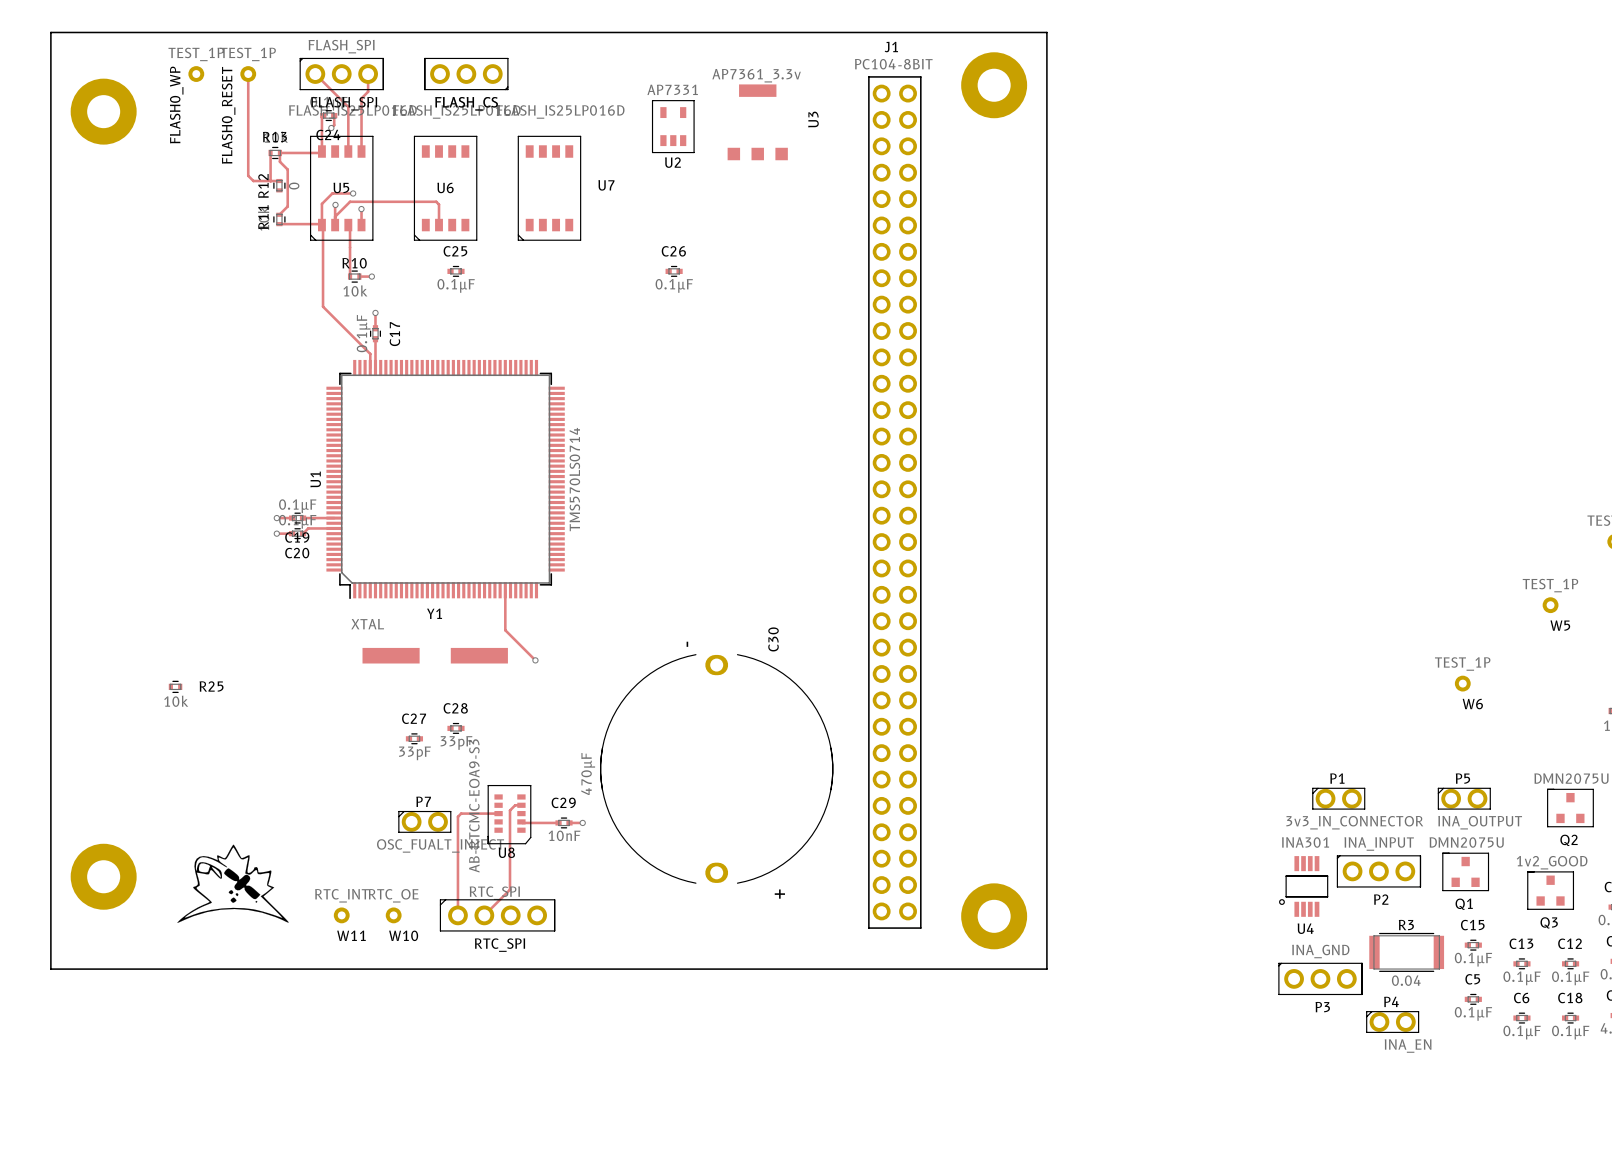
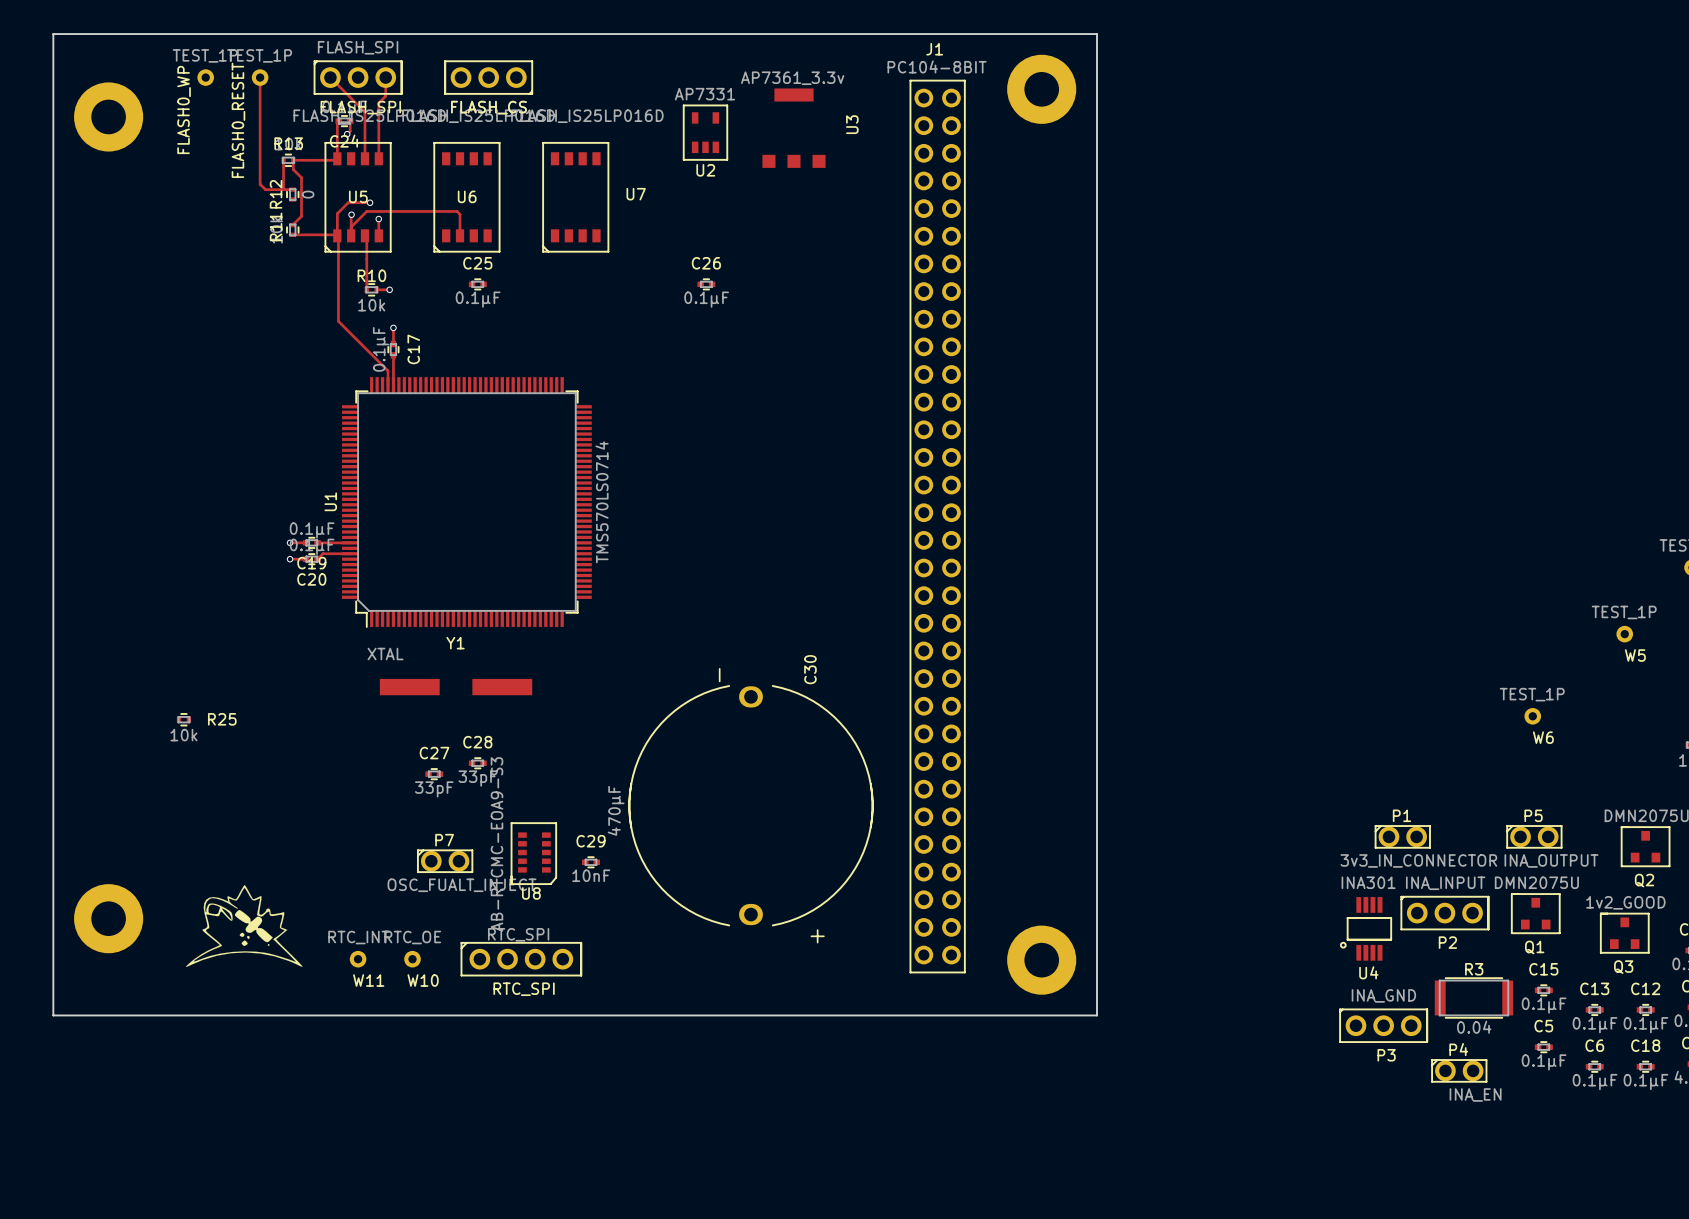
track: (505, 590) (505, 630) (535, 660) -> none
via: (535, 660) -> none
track: (521, 805) (515, 805) (510, 810) (510, 889) (484, 915) -> none
track: (498, 813) (461, 813) (457, 816) (457, 915) -> none
track: (521, 821) (558, 822) -> none
track: (569, 822) (582, 822) -> none
via: (582, 822) -> none

